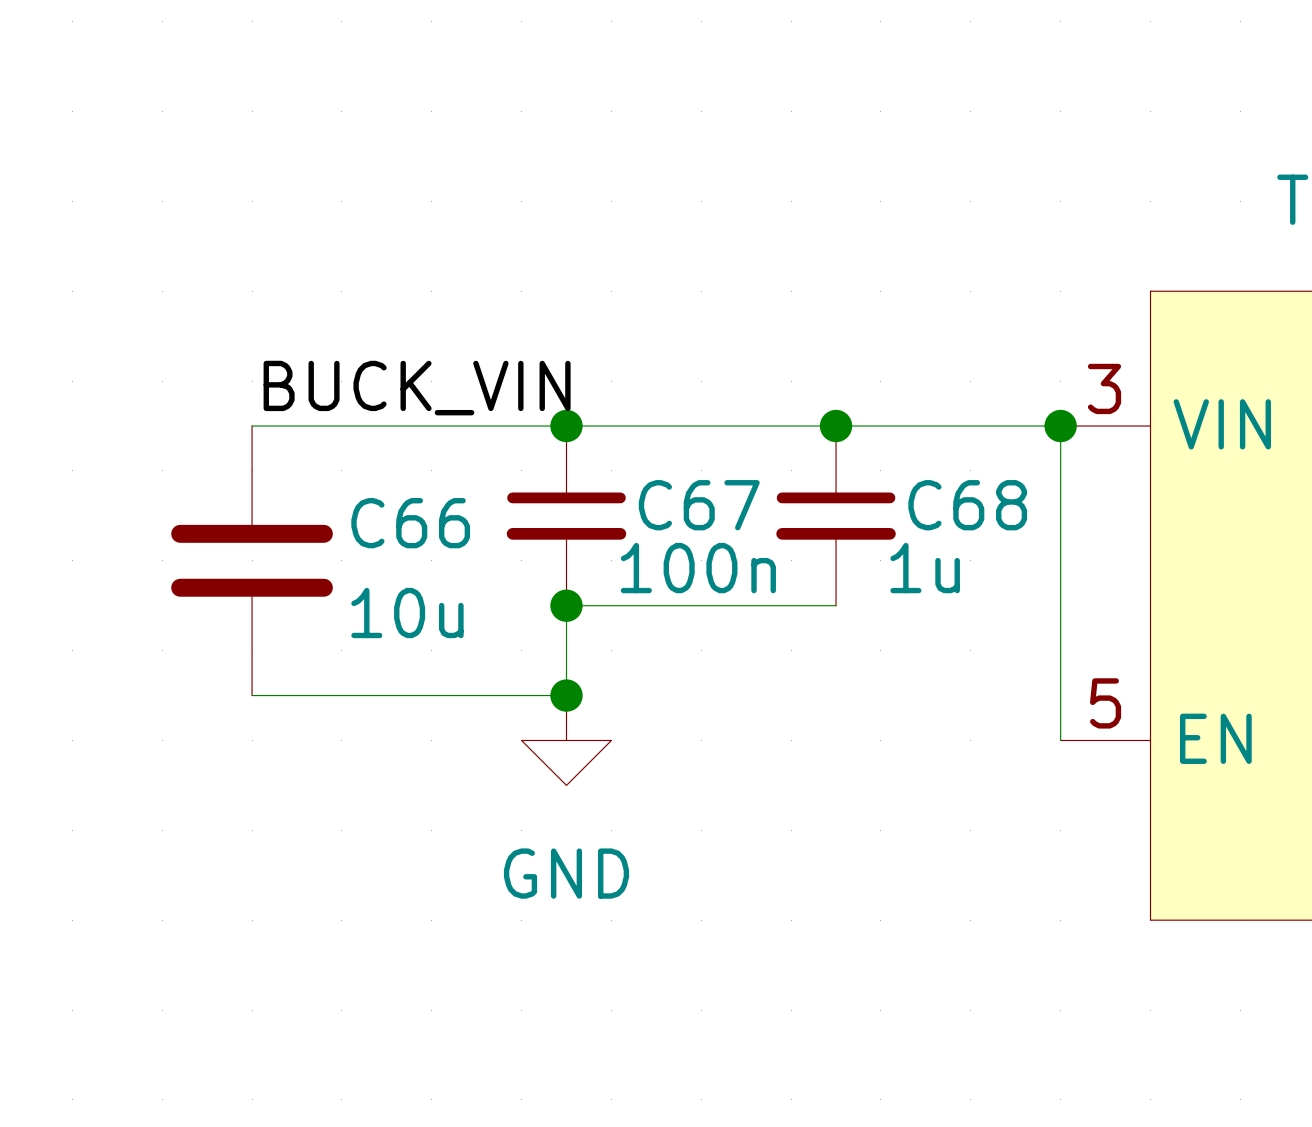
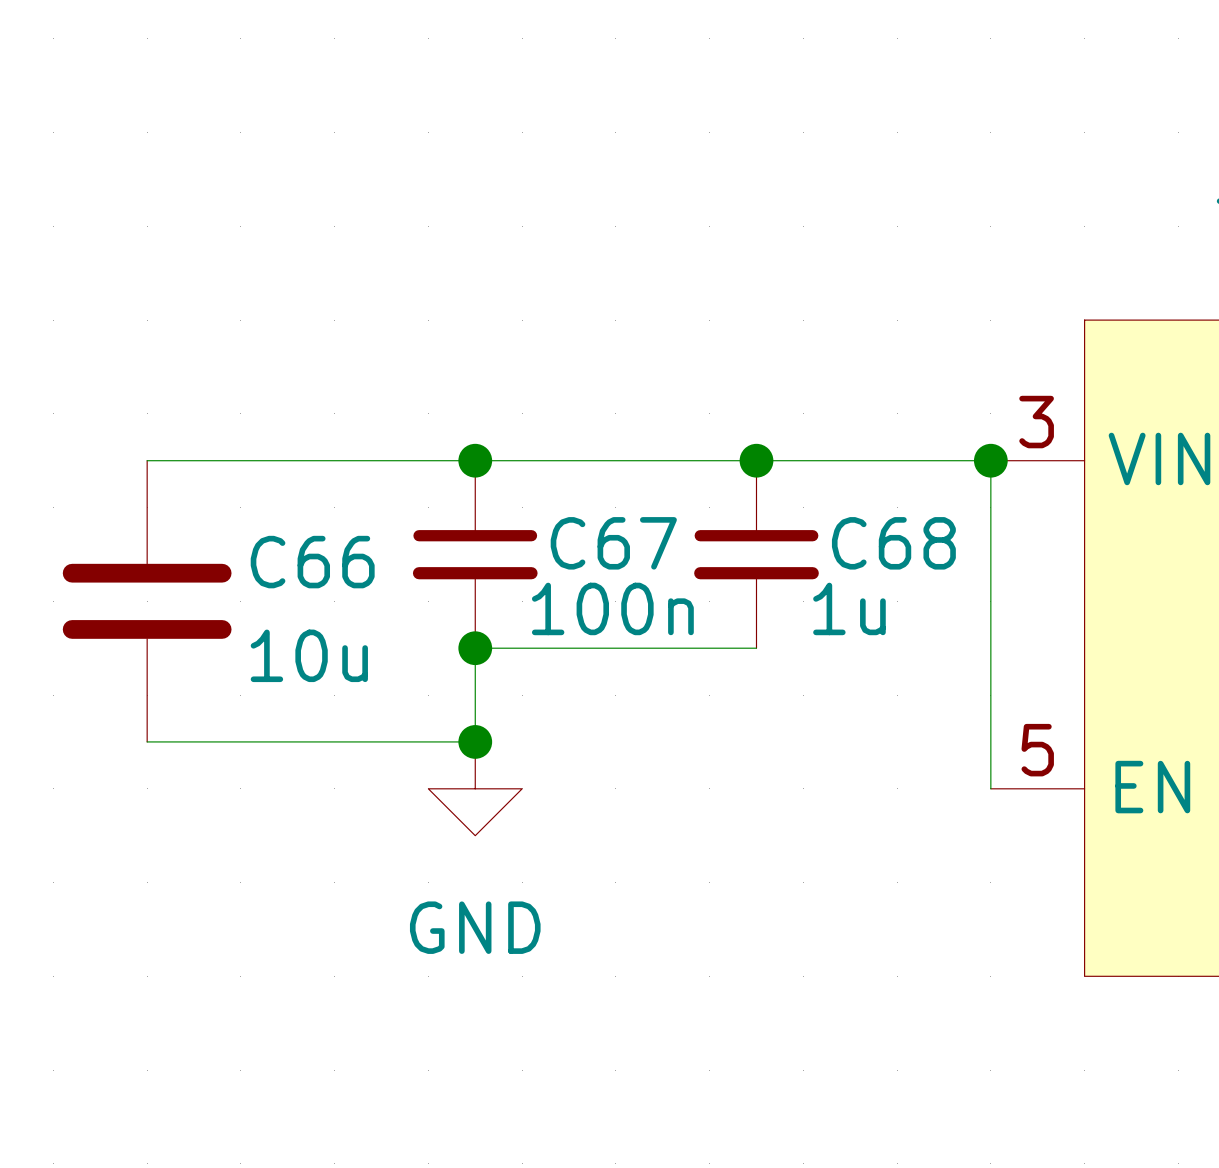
label: BUCK_VIN (417, 388) -> none

